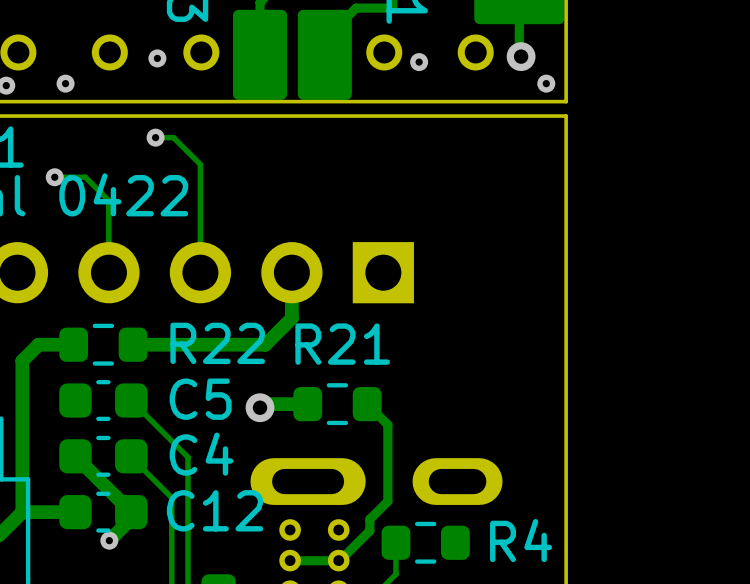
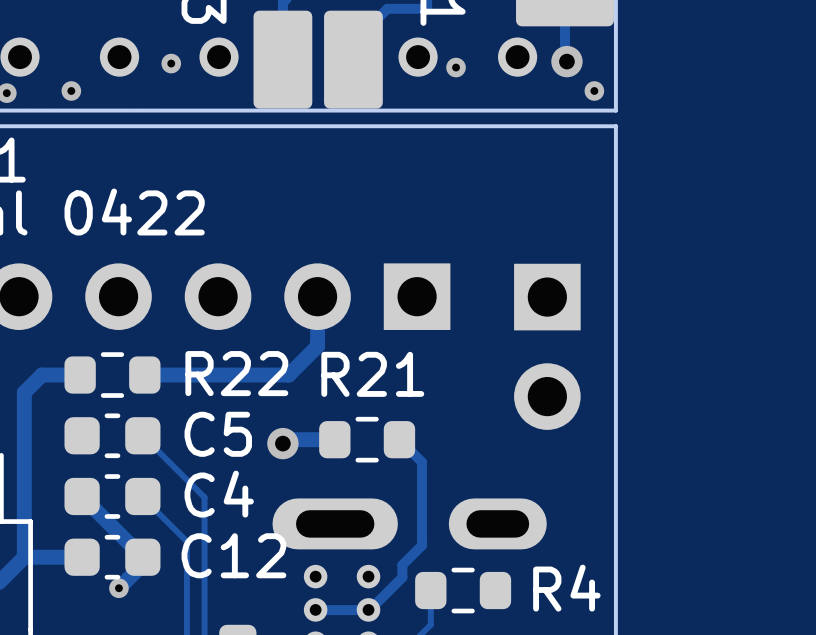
track: (155, 137) (173, 137) (200, 164) (200, 272) -> none
via: (155, 137) -> none
track: (54, 177) (85, 177) (108, 200) (108, 272) -> none
via: (54, 177) -> none
part: none -> (547, 346)

